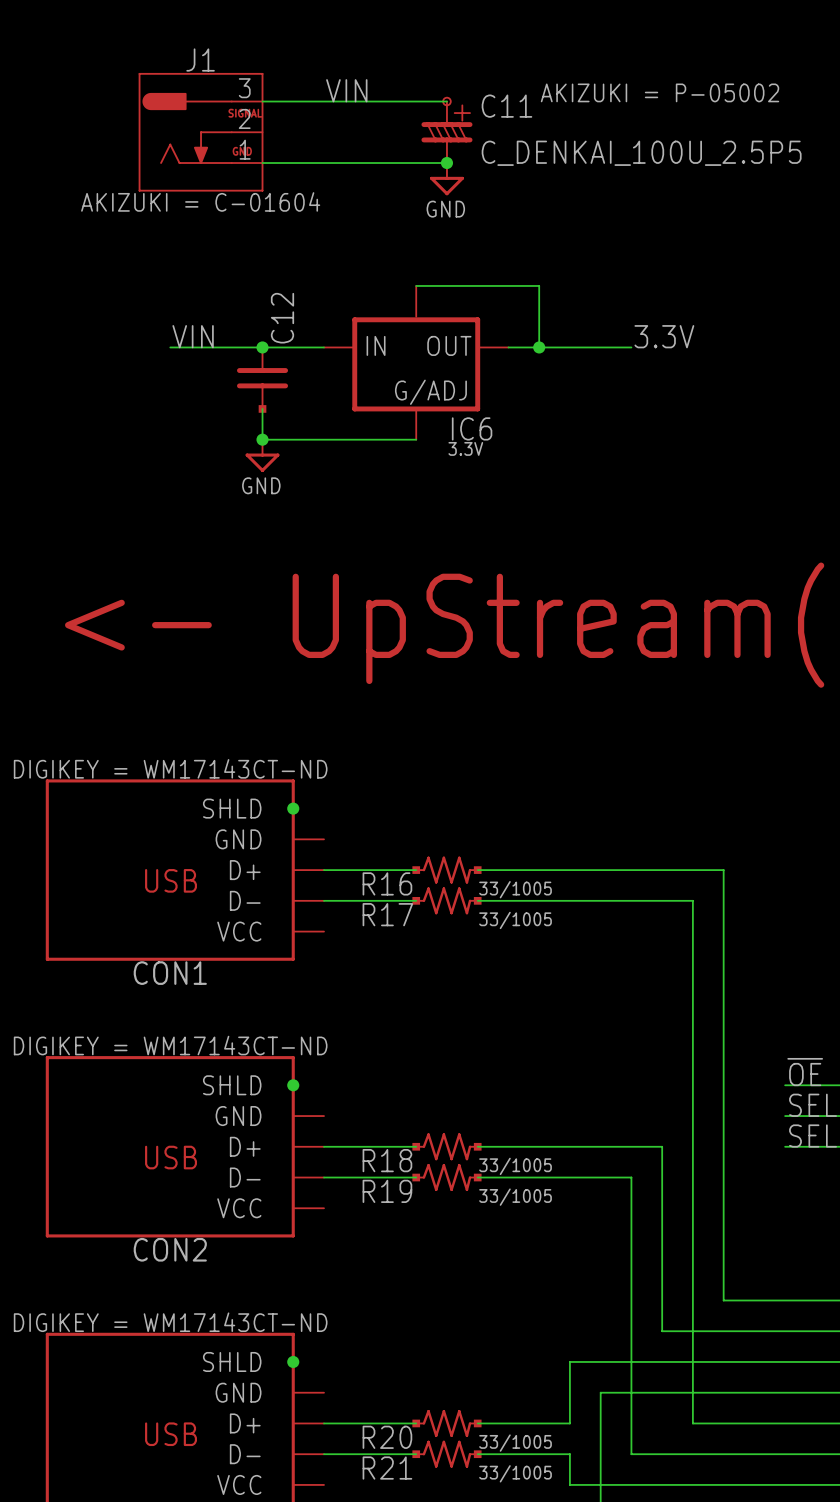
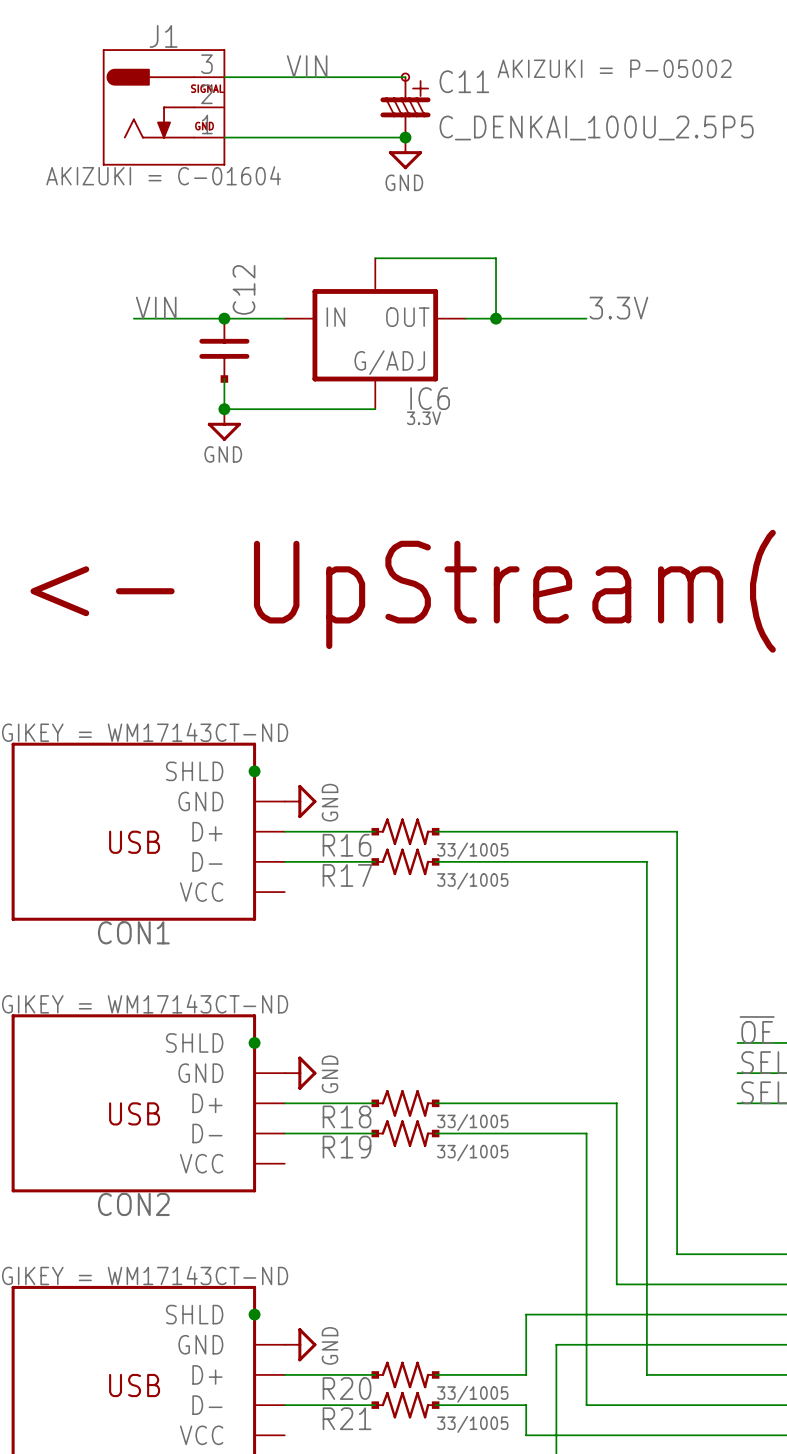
power symbol: none -> GND (300, 801)
power symbol: none -> GND (300, 1073)
power symbol: none -> GND (300, 1344)

